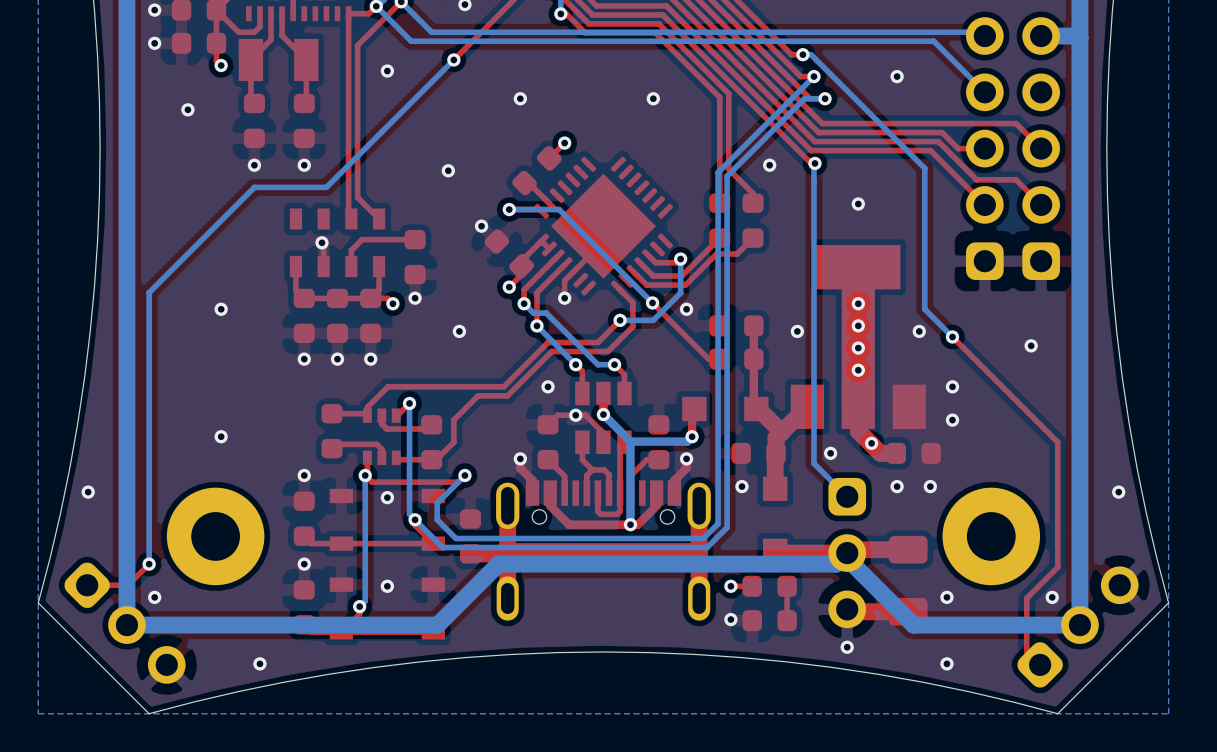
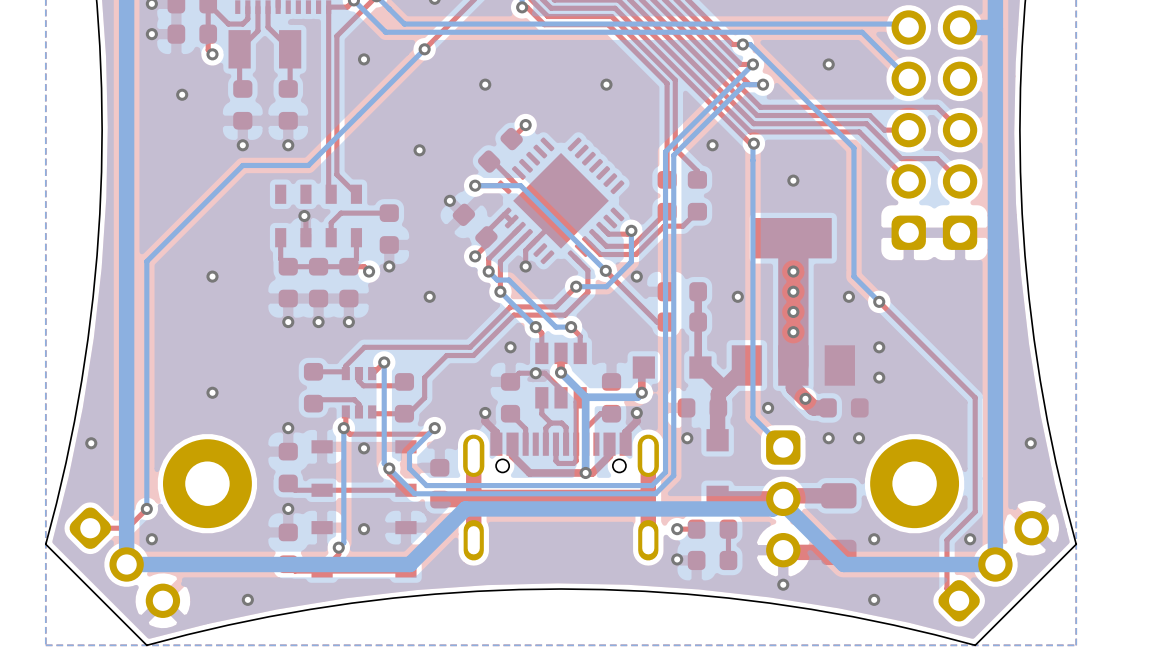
via: (1031, 345) -> none

